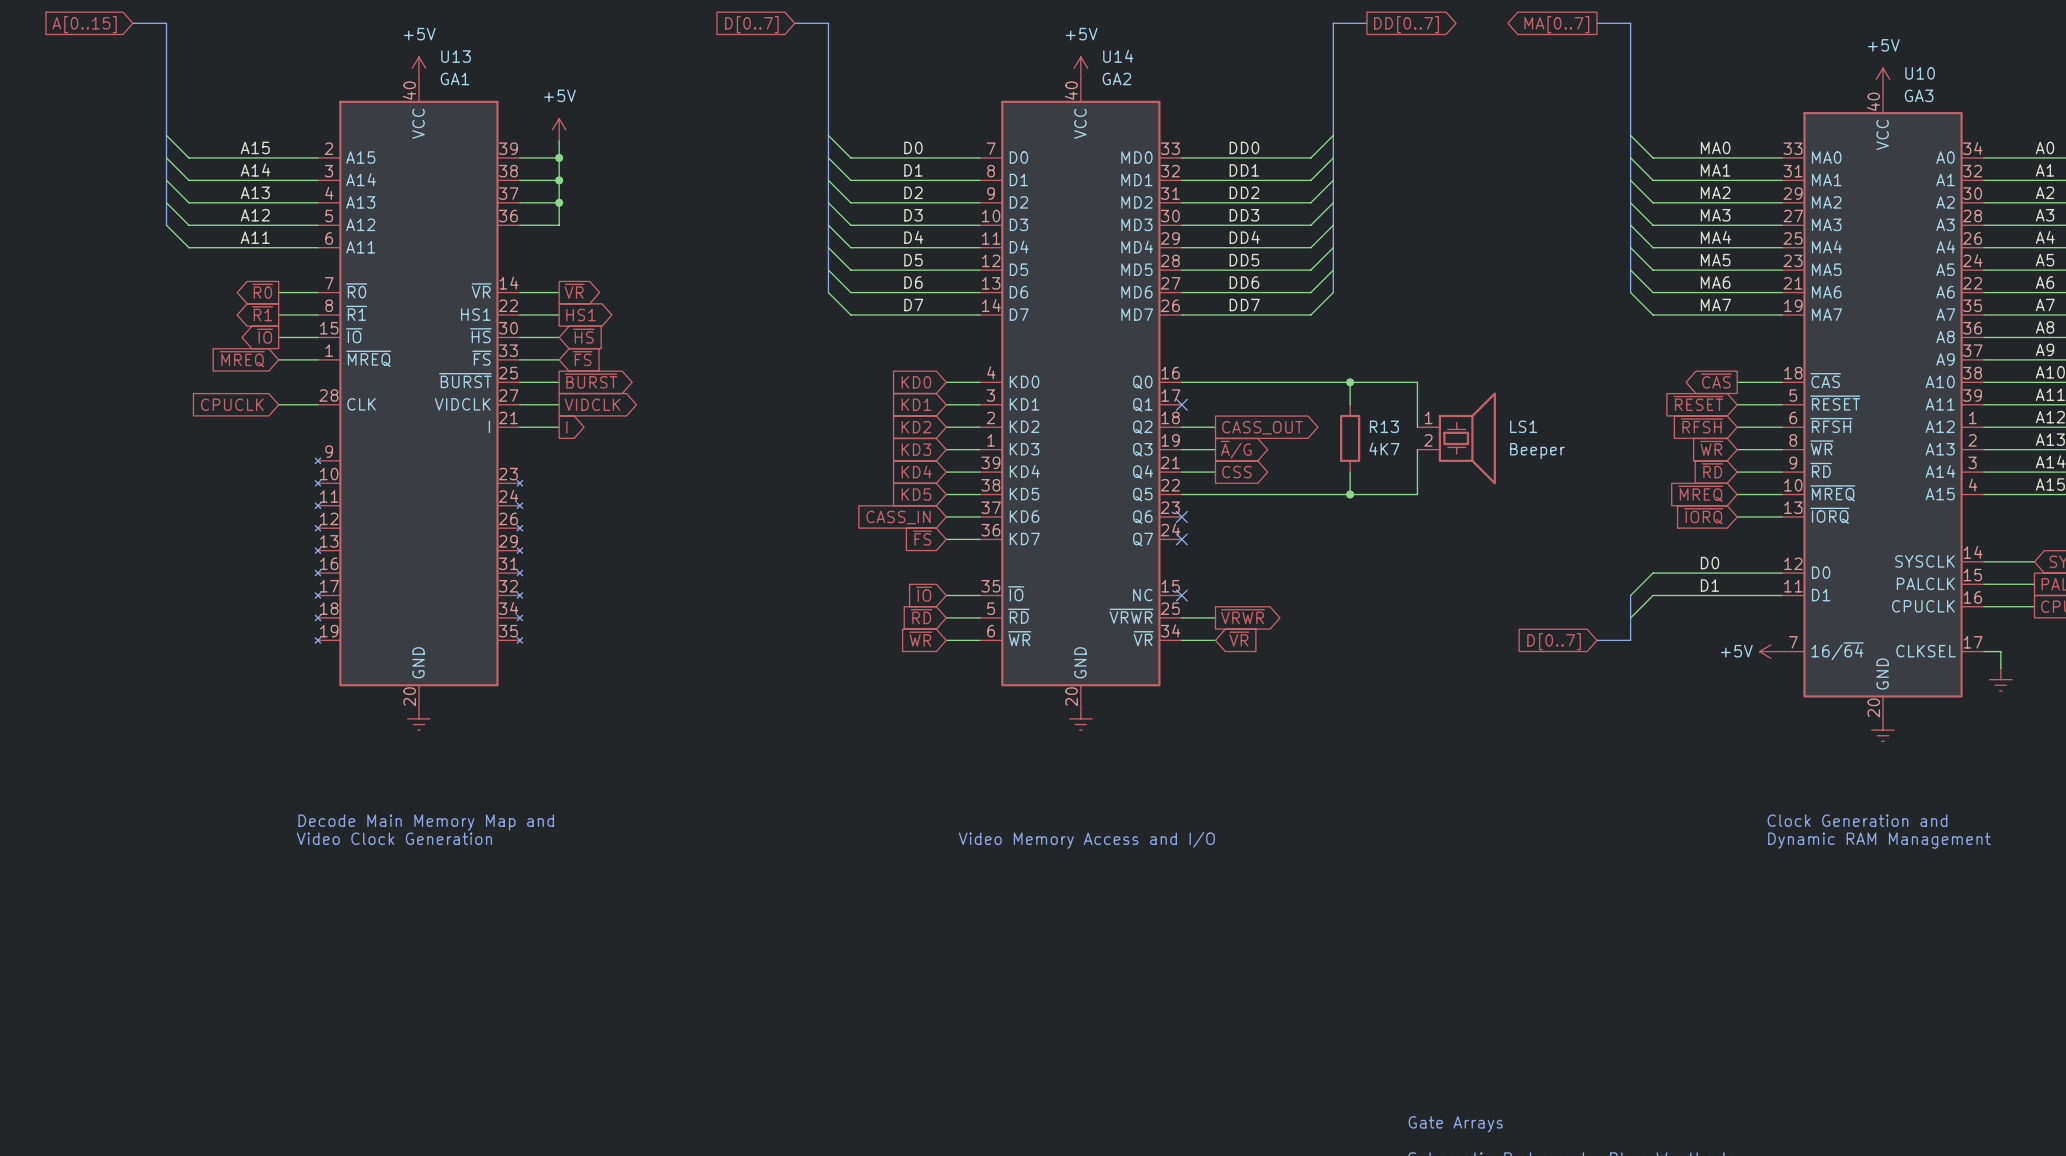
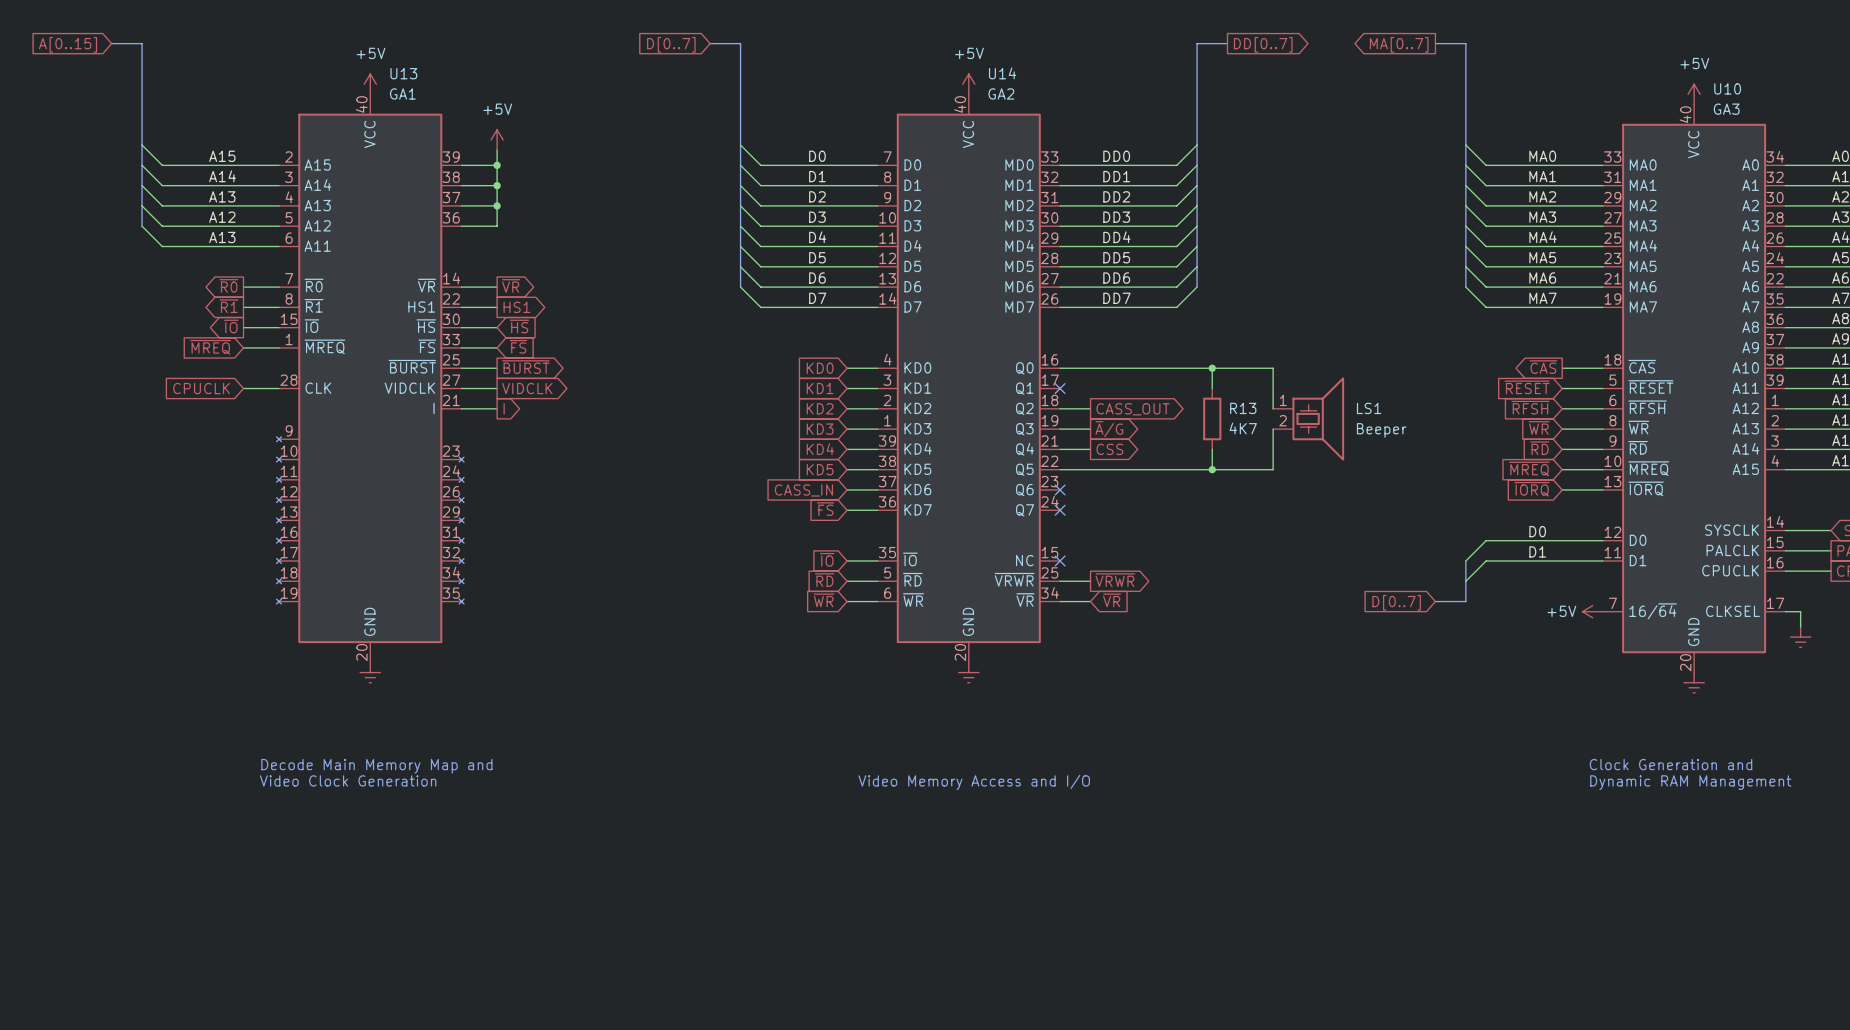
label: A11 (255, 237) -> A13 (222, 237)

